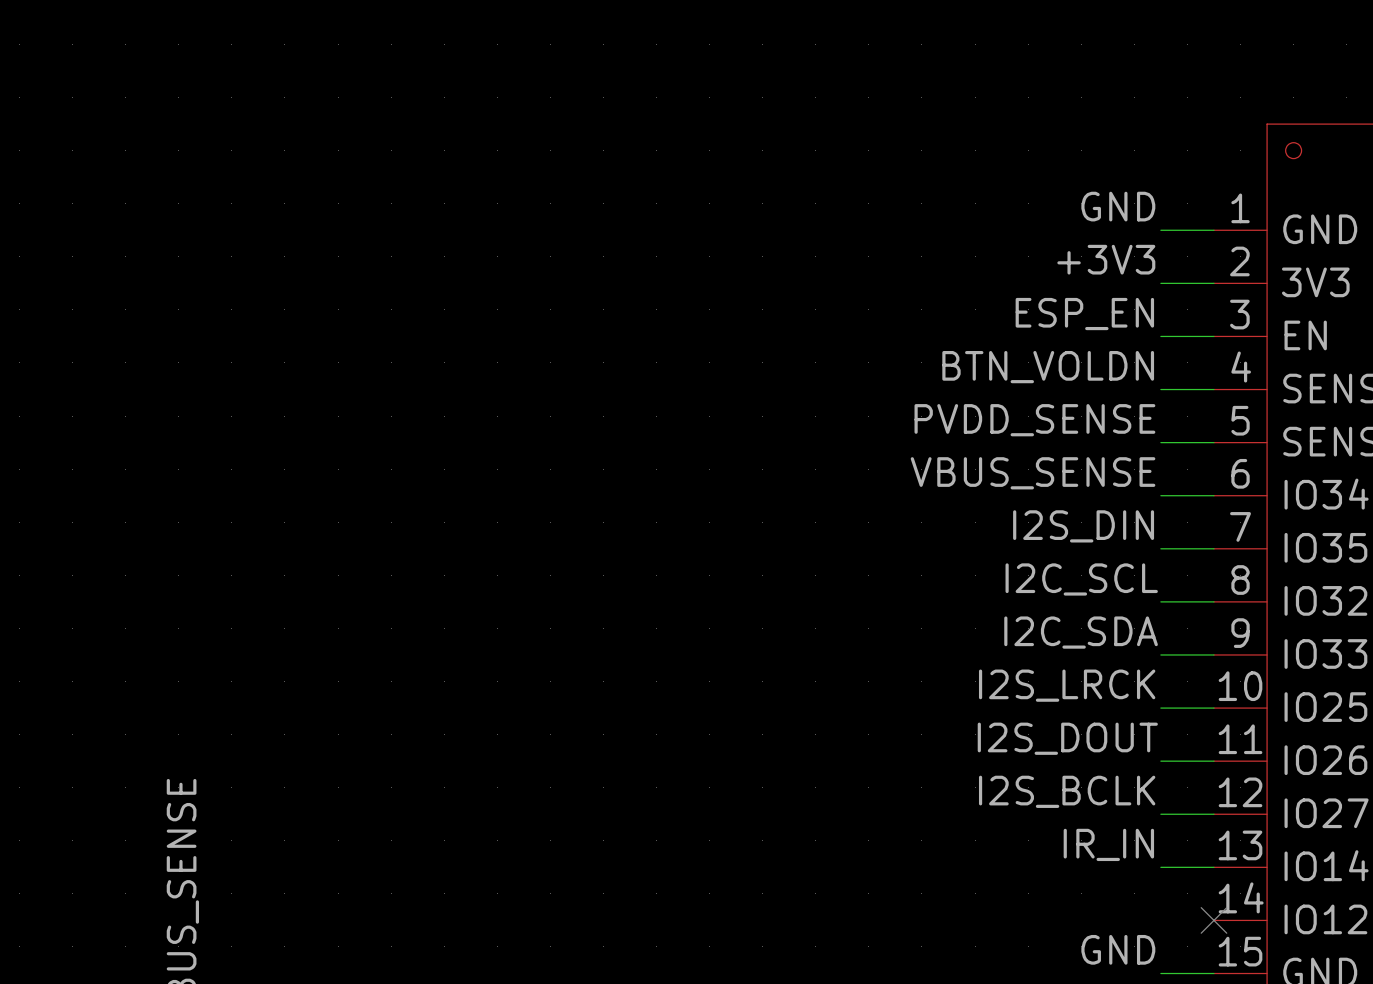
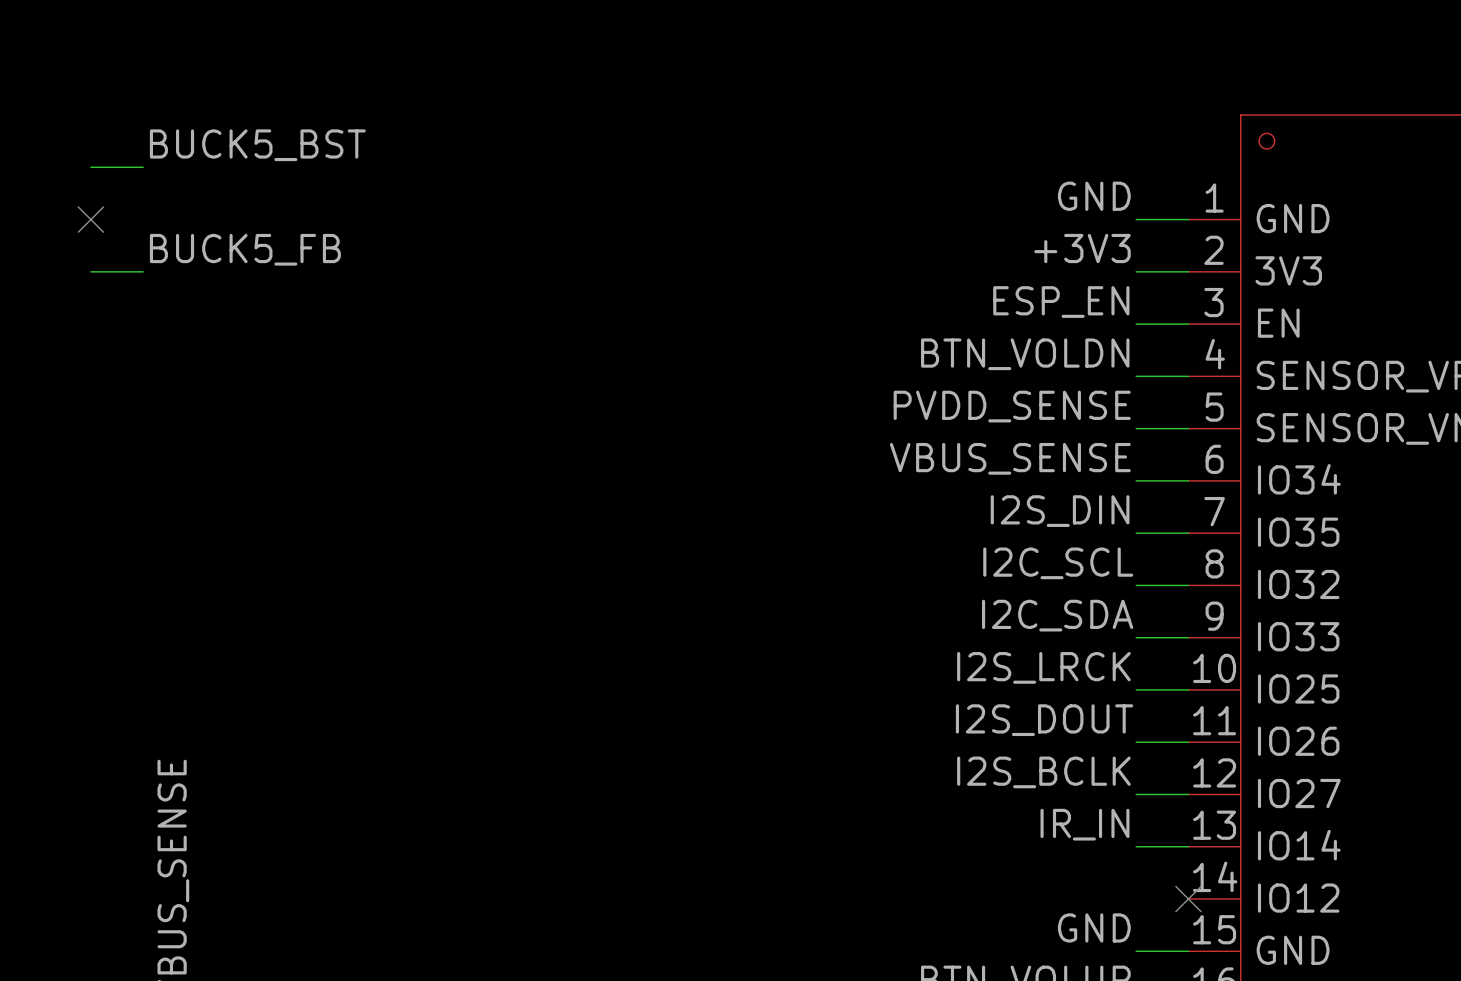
label: none -> BUCK5_BST (257, 145)
wire: none -> (90, 167) (143, 167)
no-connect mark: none -> (90, 219)
label: none -> BUCK5_FB (245, 249)
wire: none -> (90, 271) (143, 271)

